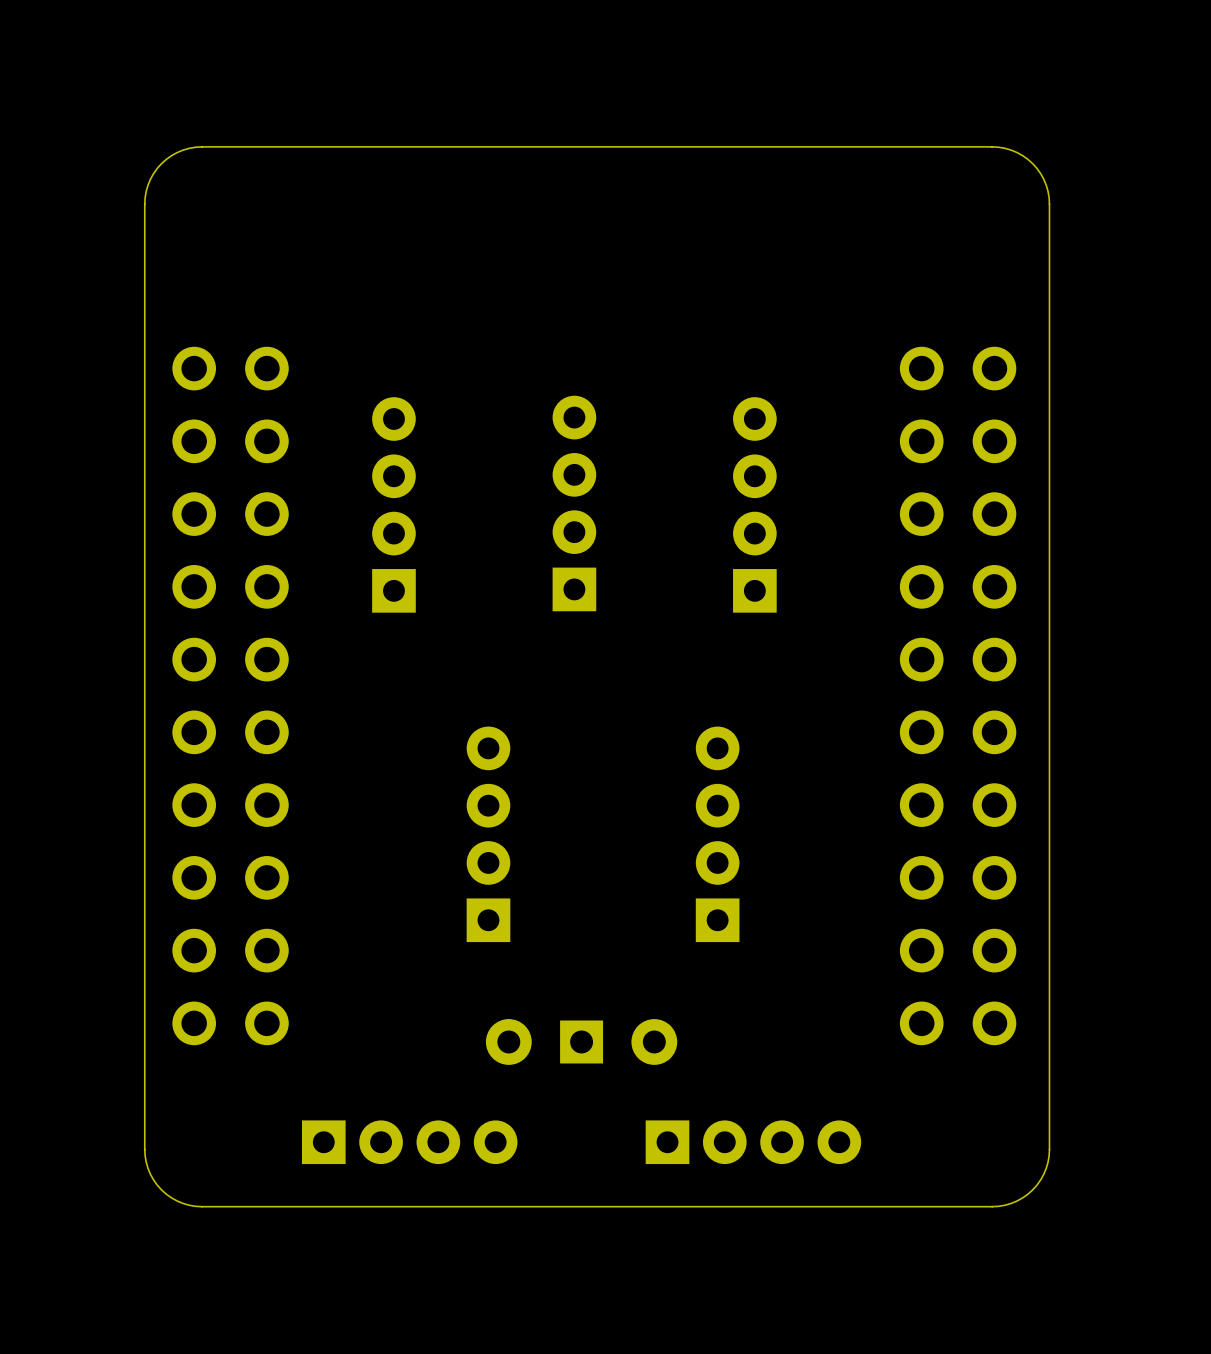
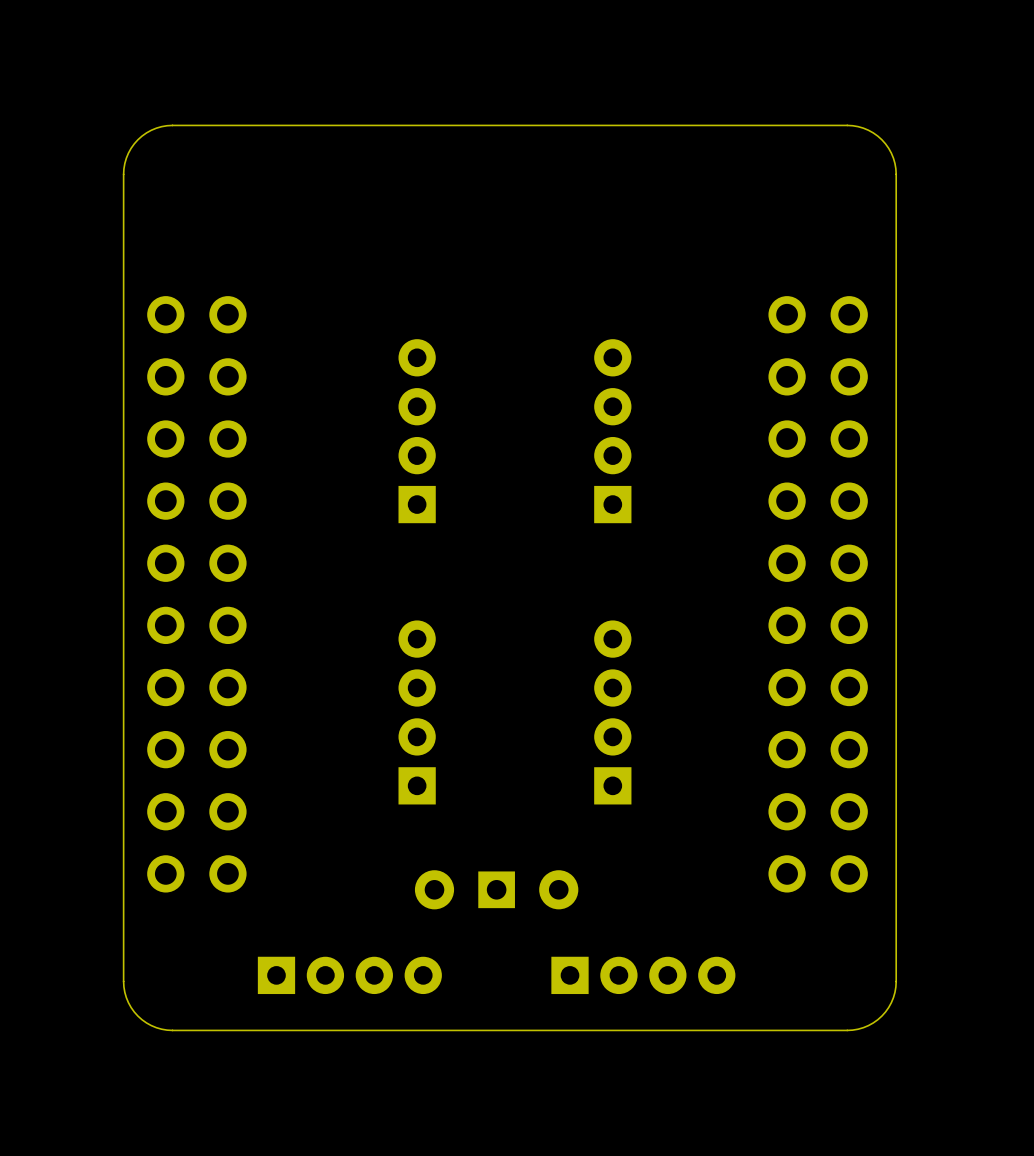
part: (574, 503) -> none
part: (393, 504) -> none
part: none -> (417, 431)
part position: (754, 504) -> (612, 431)

